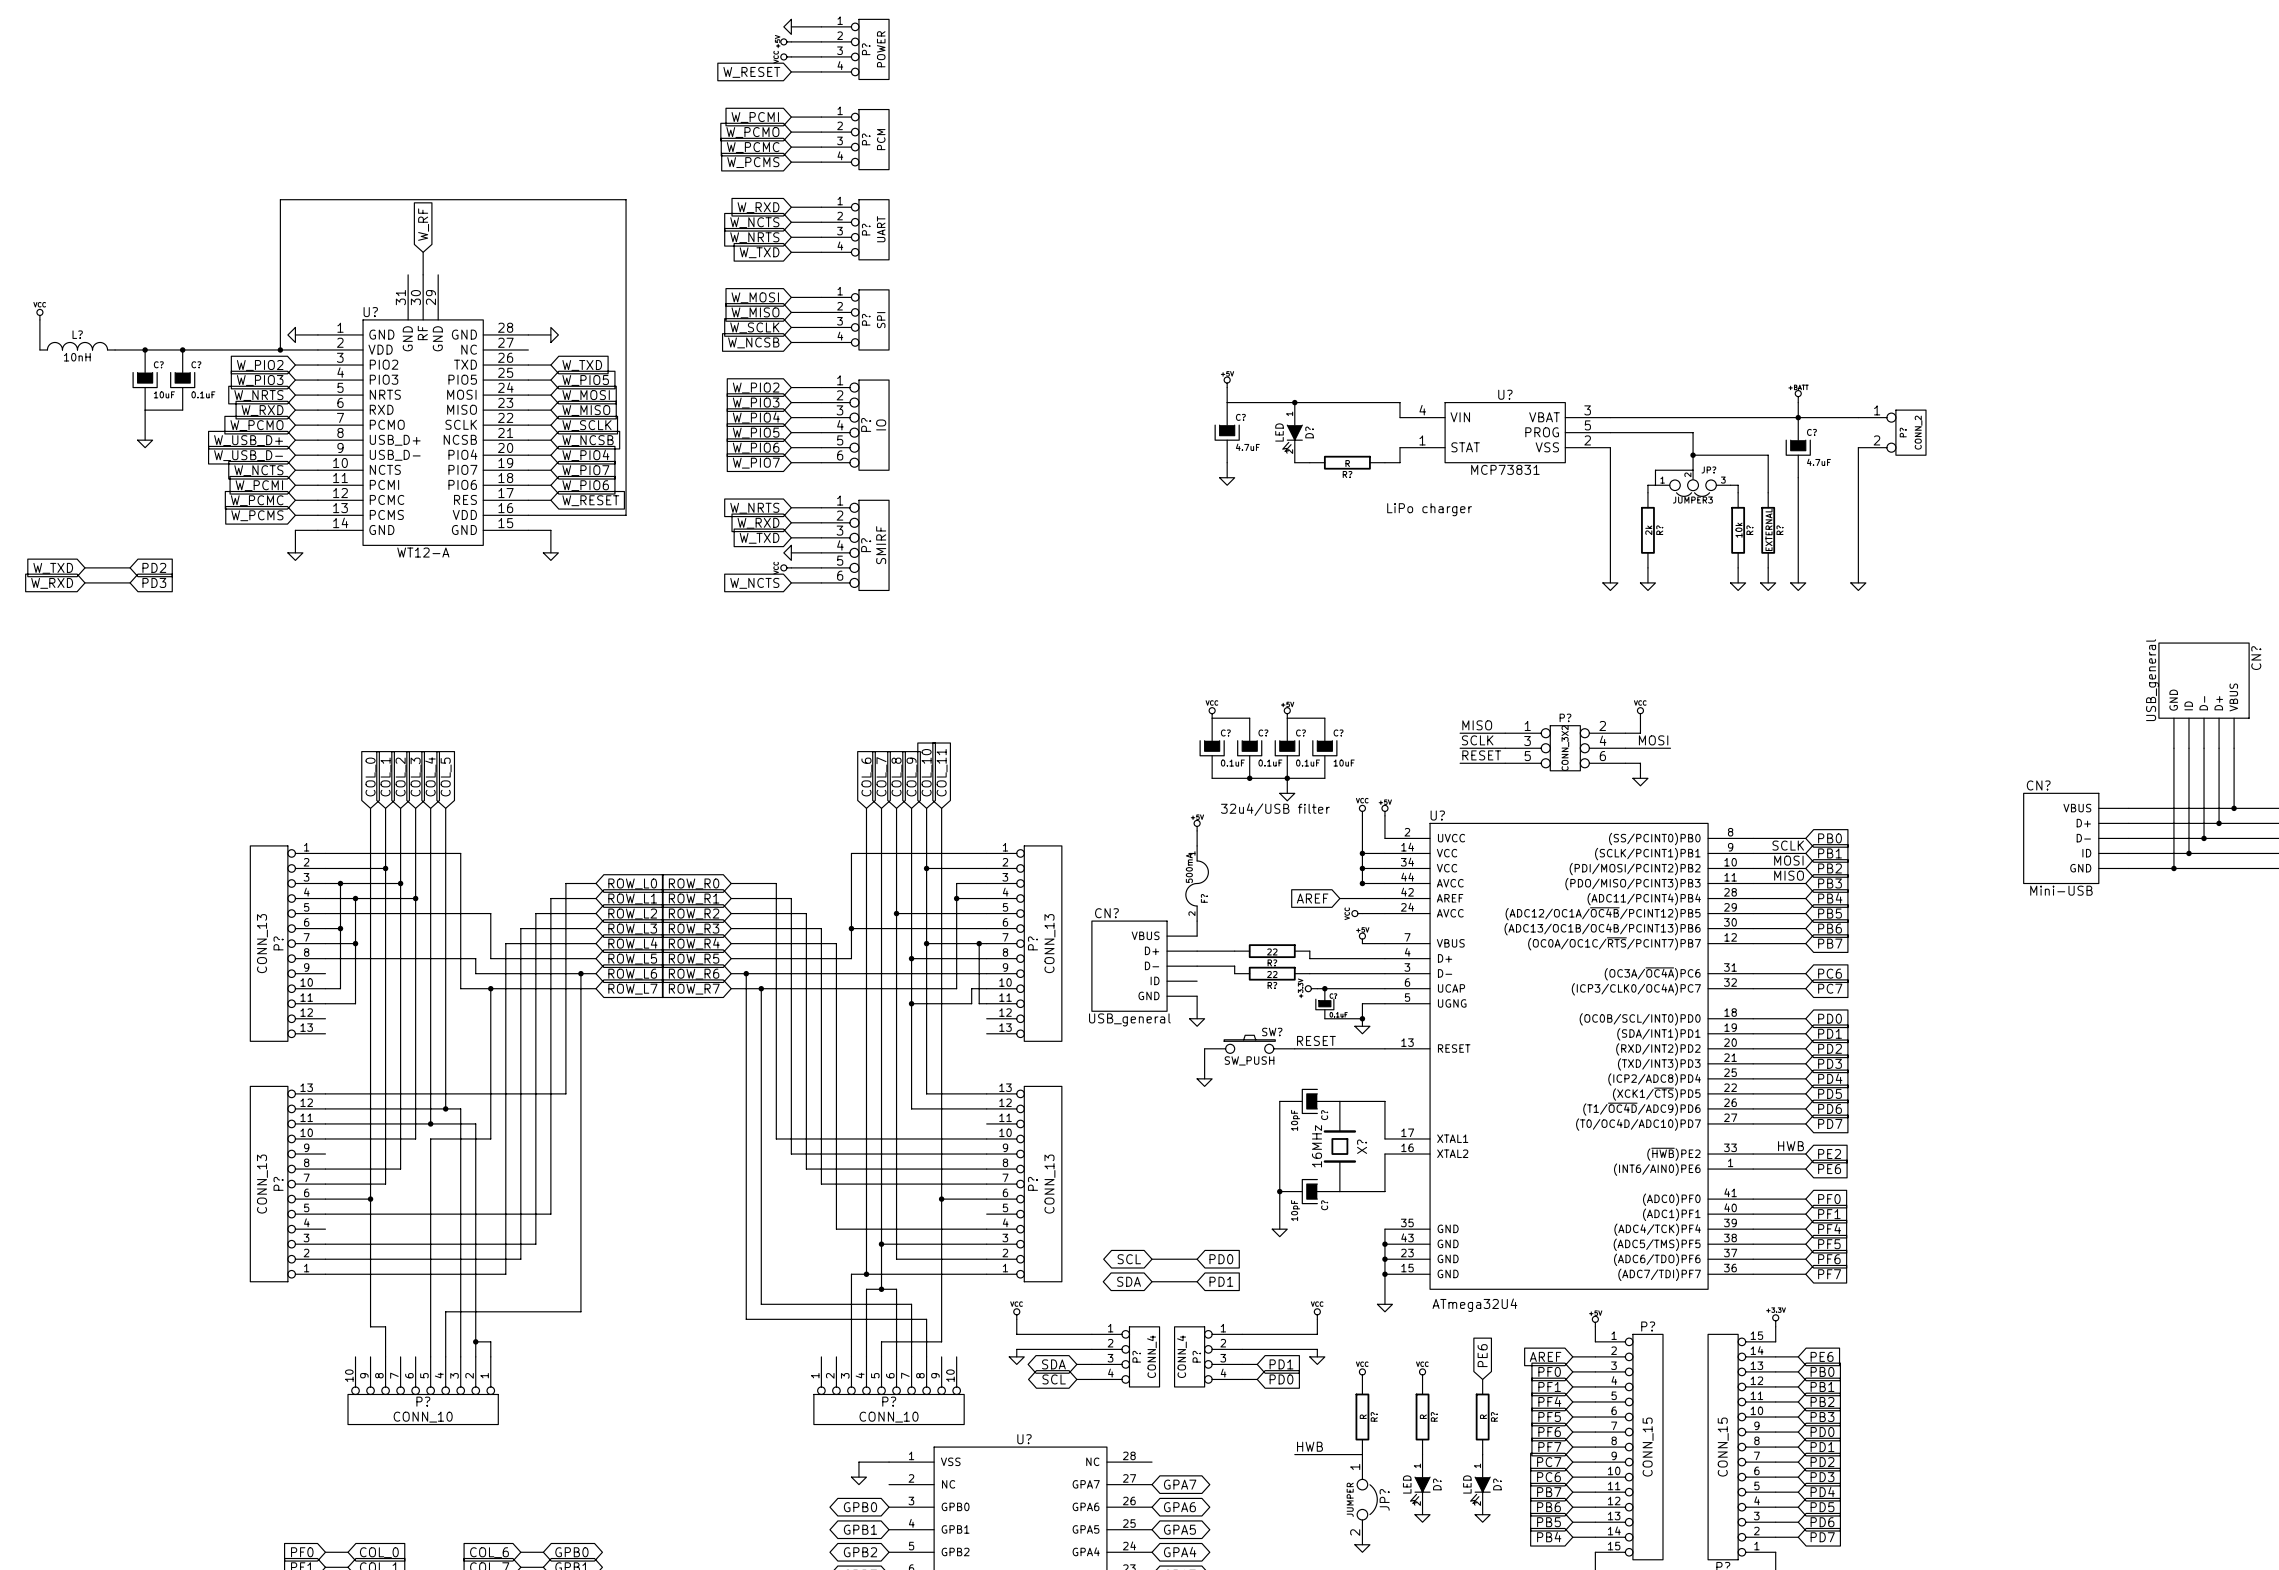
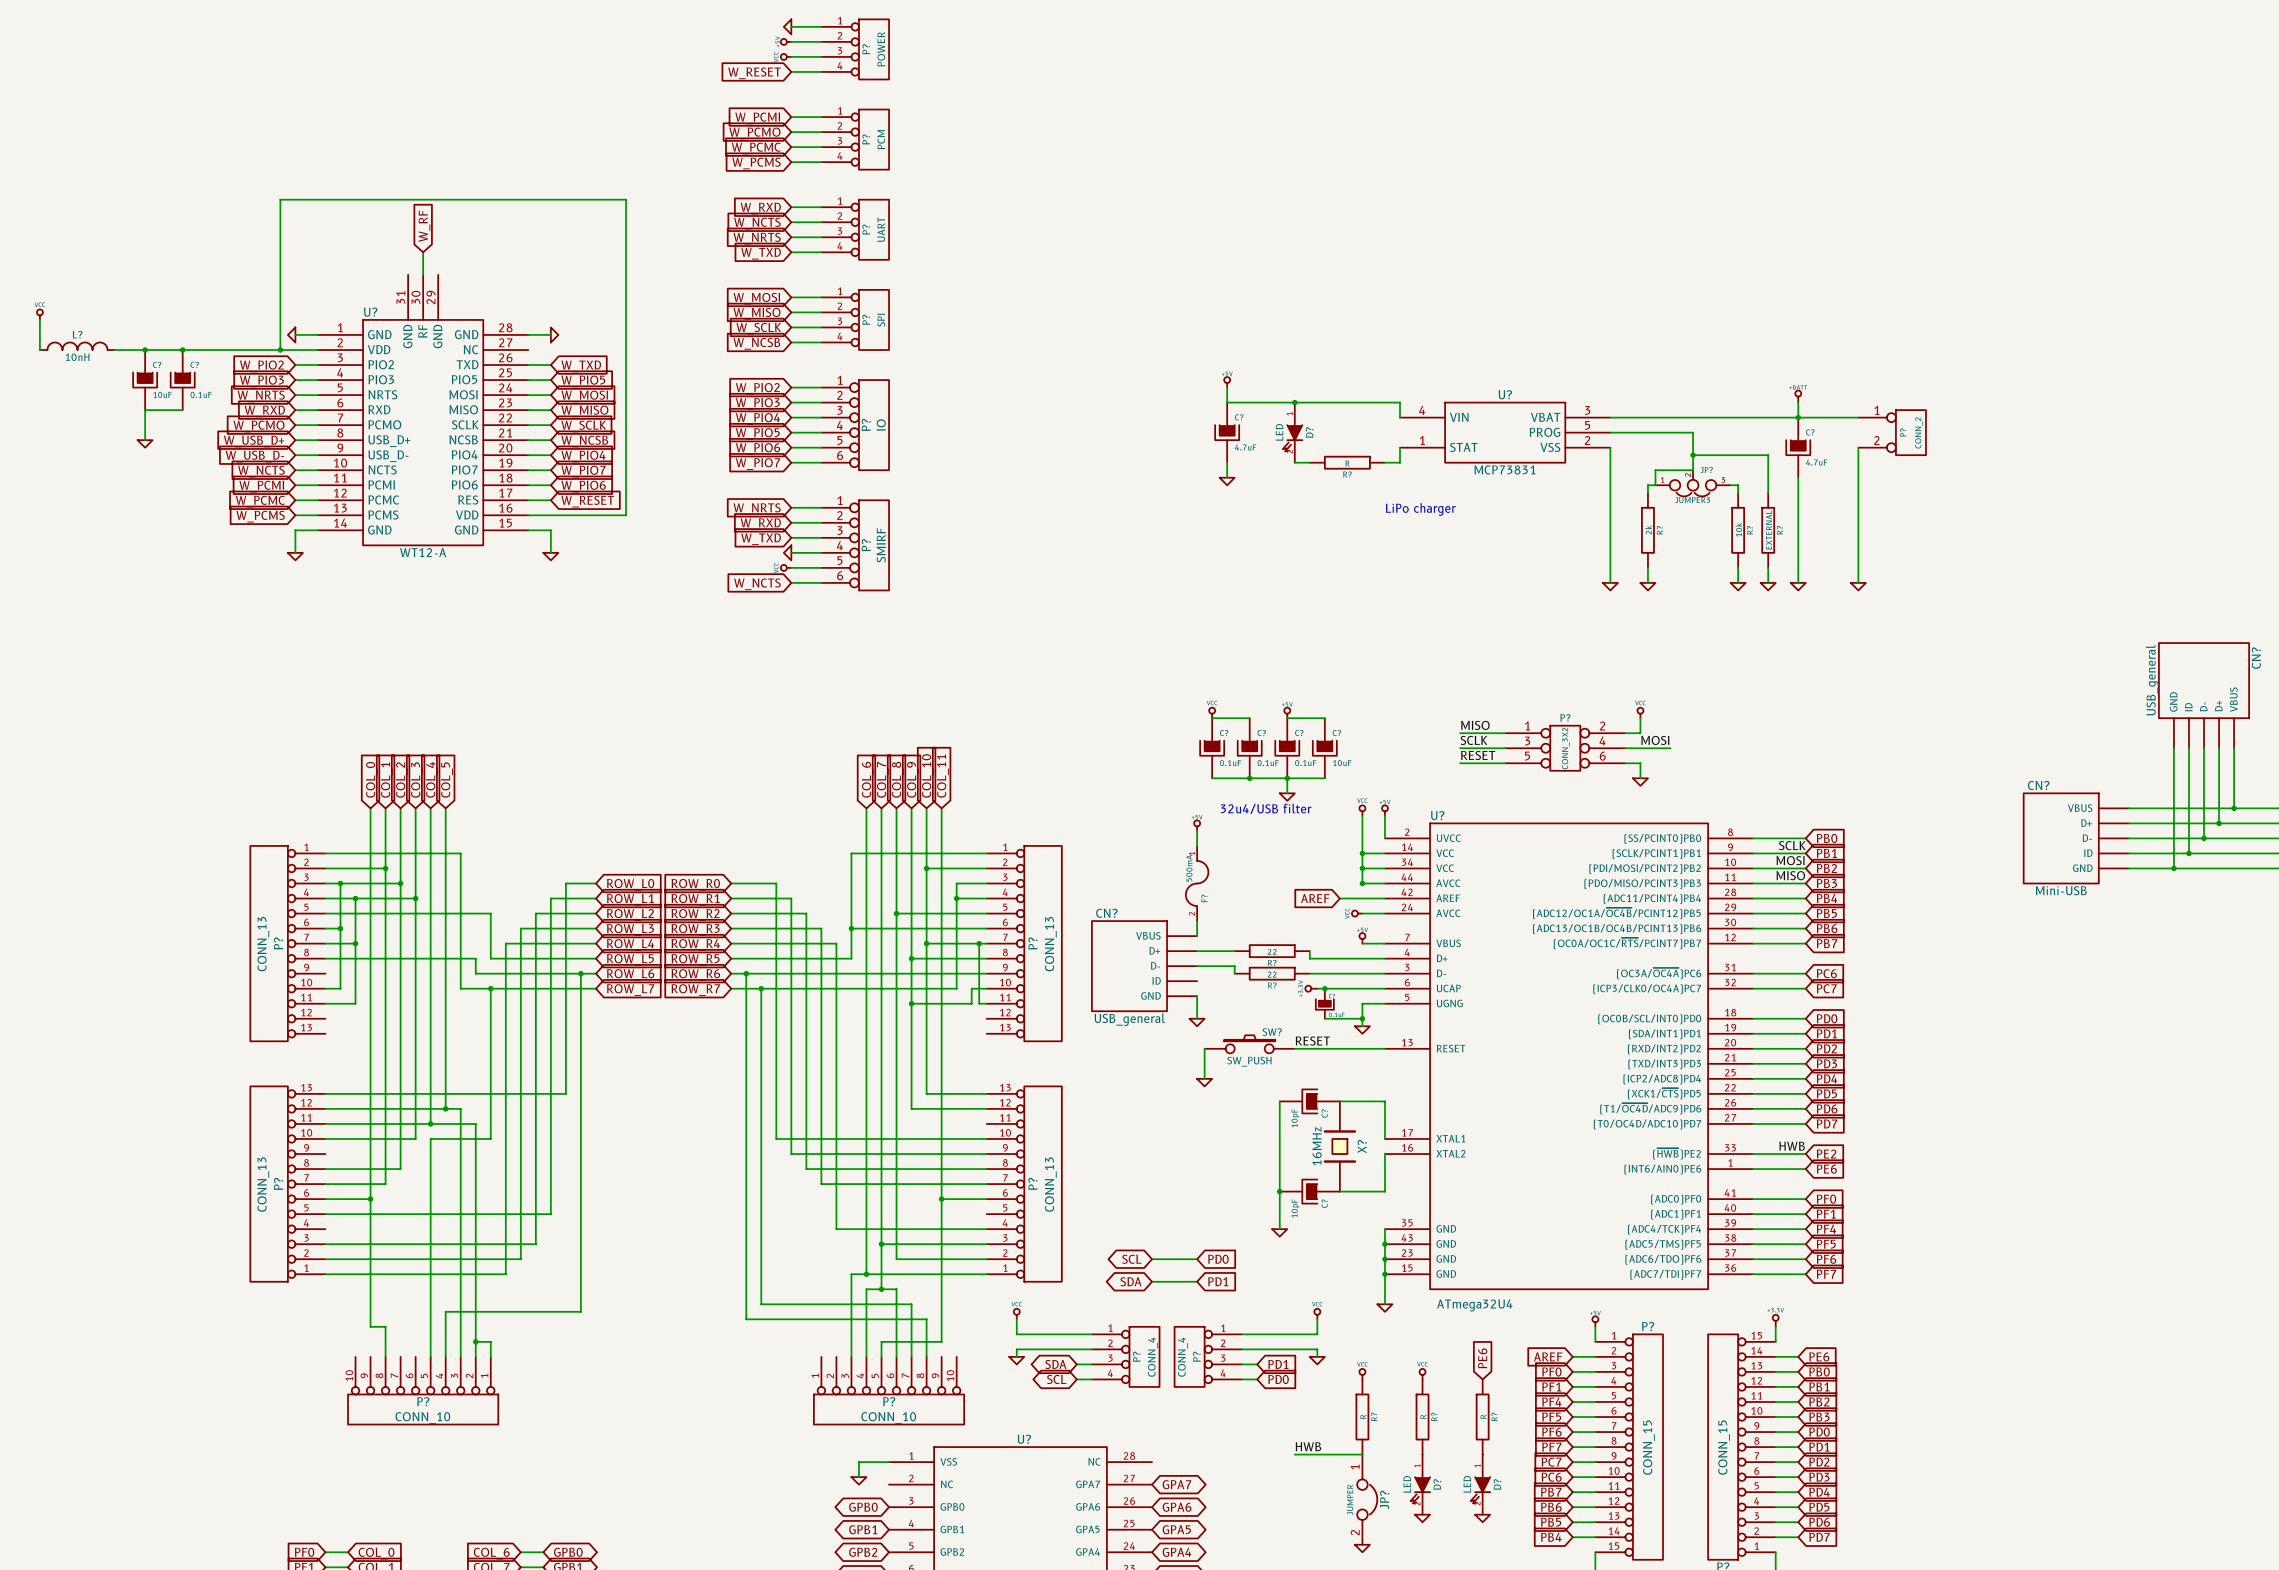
wire: (85, 567) (130, 567) -> none
global label: PD2 (154, 567) -> none
global label: W_TXD (53, 568) -> none
wire: (85, 582) (130, 582) -> none
global label: PD3 (154, 582) -> none
global label: W_RXD (52, 583) -> none

